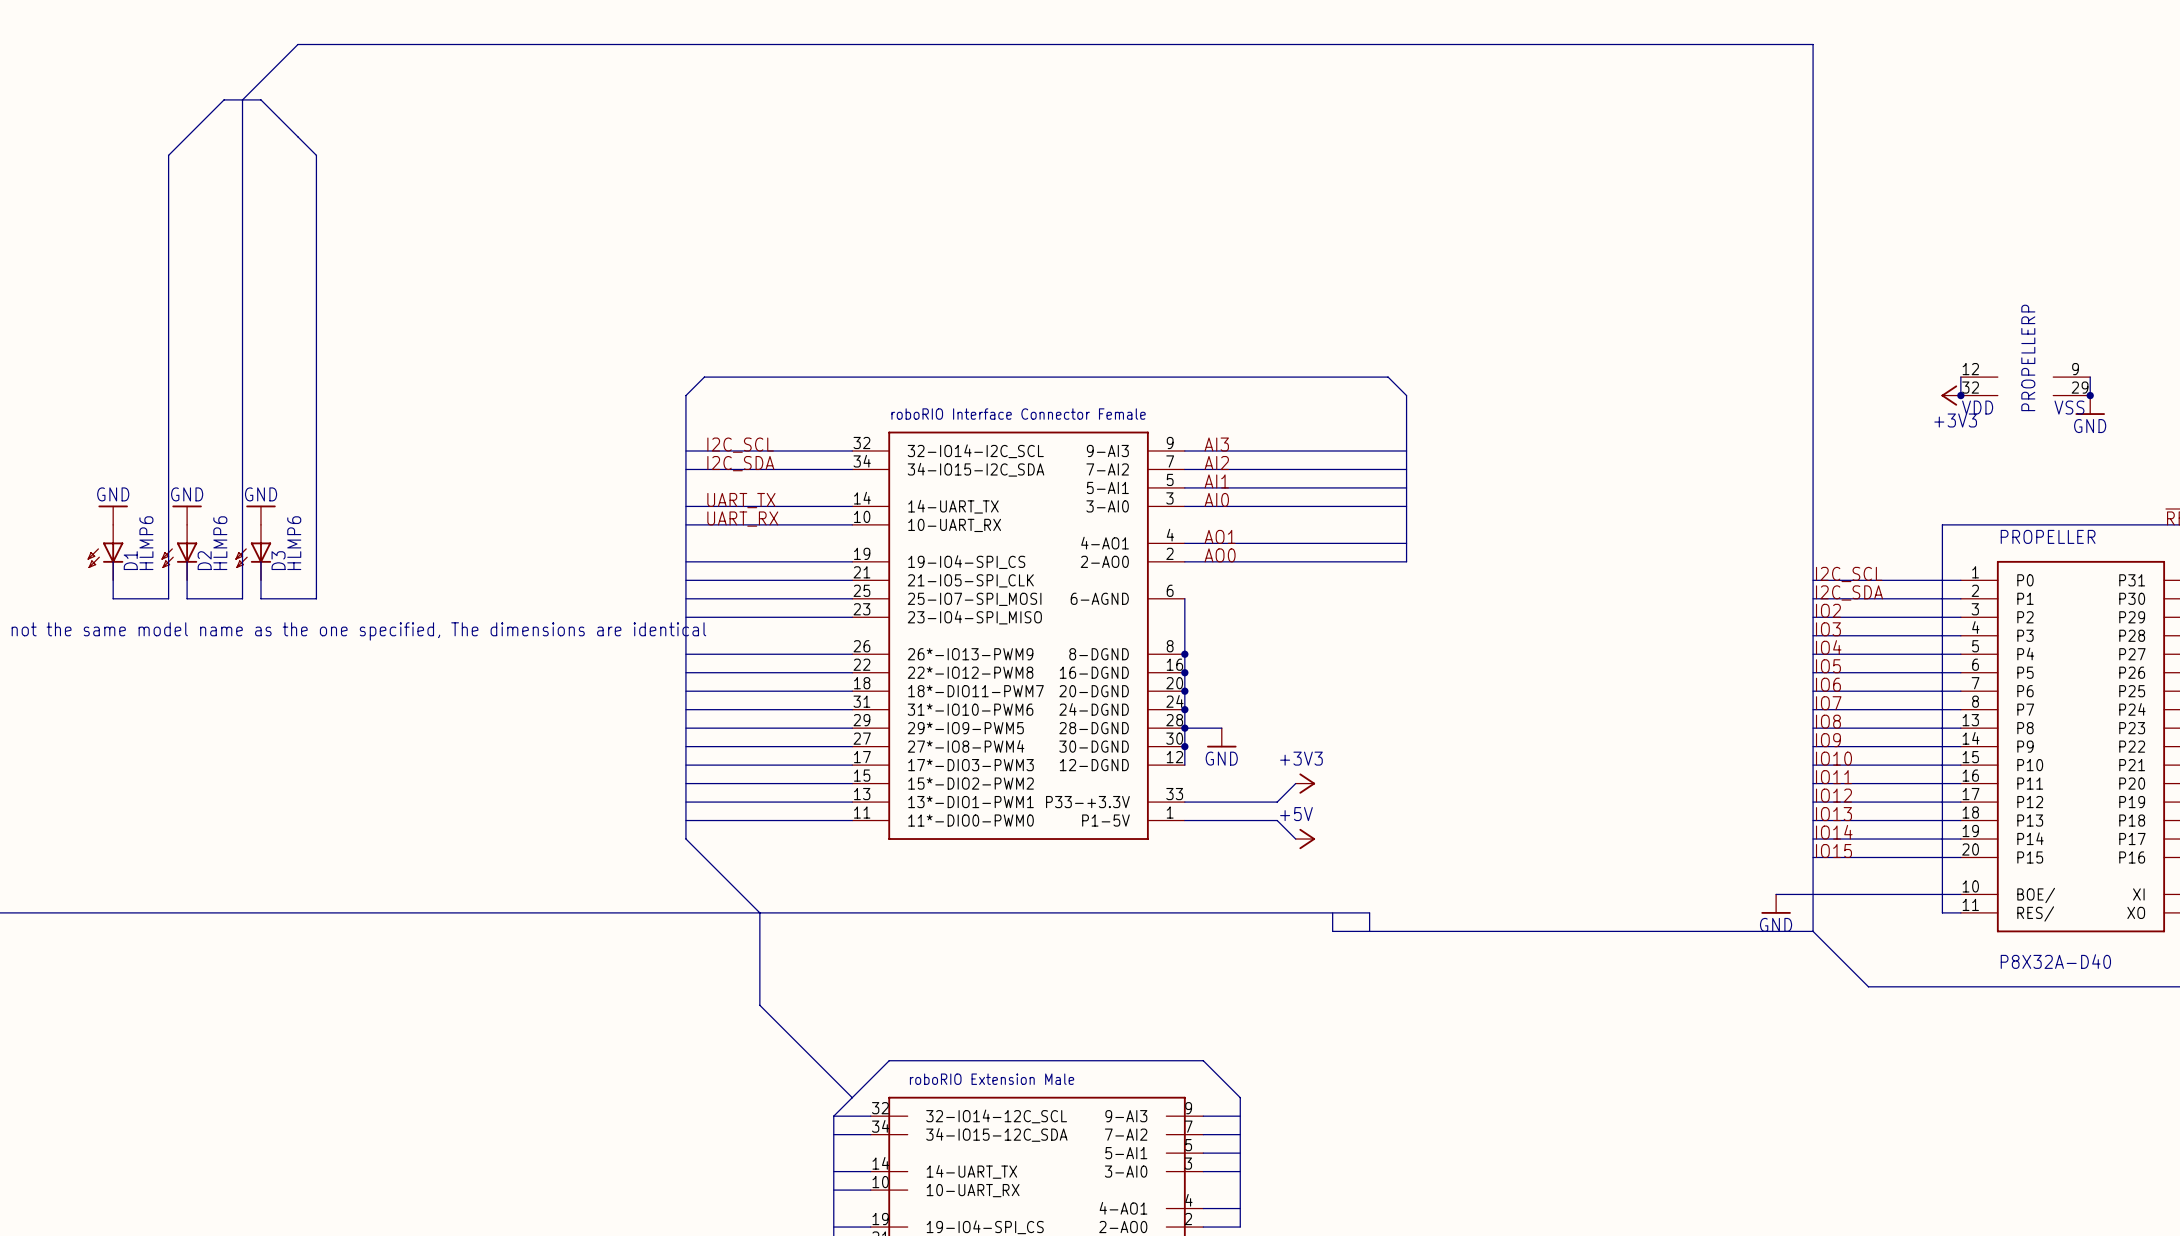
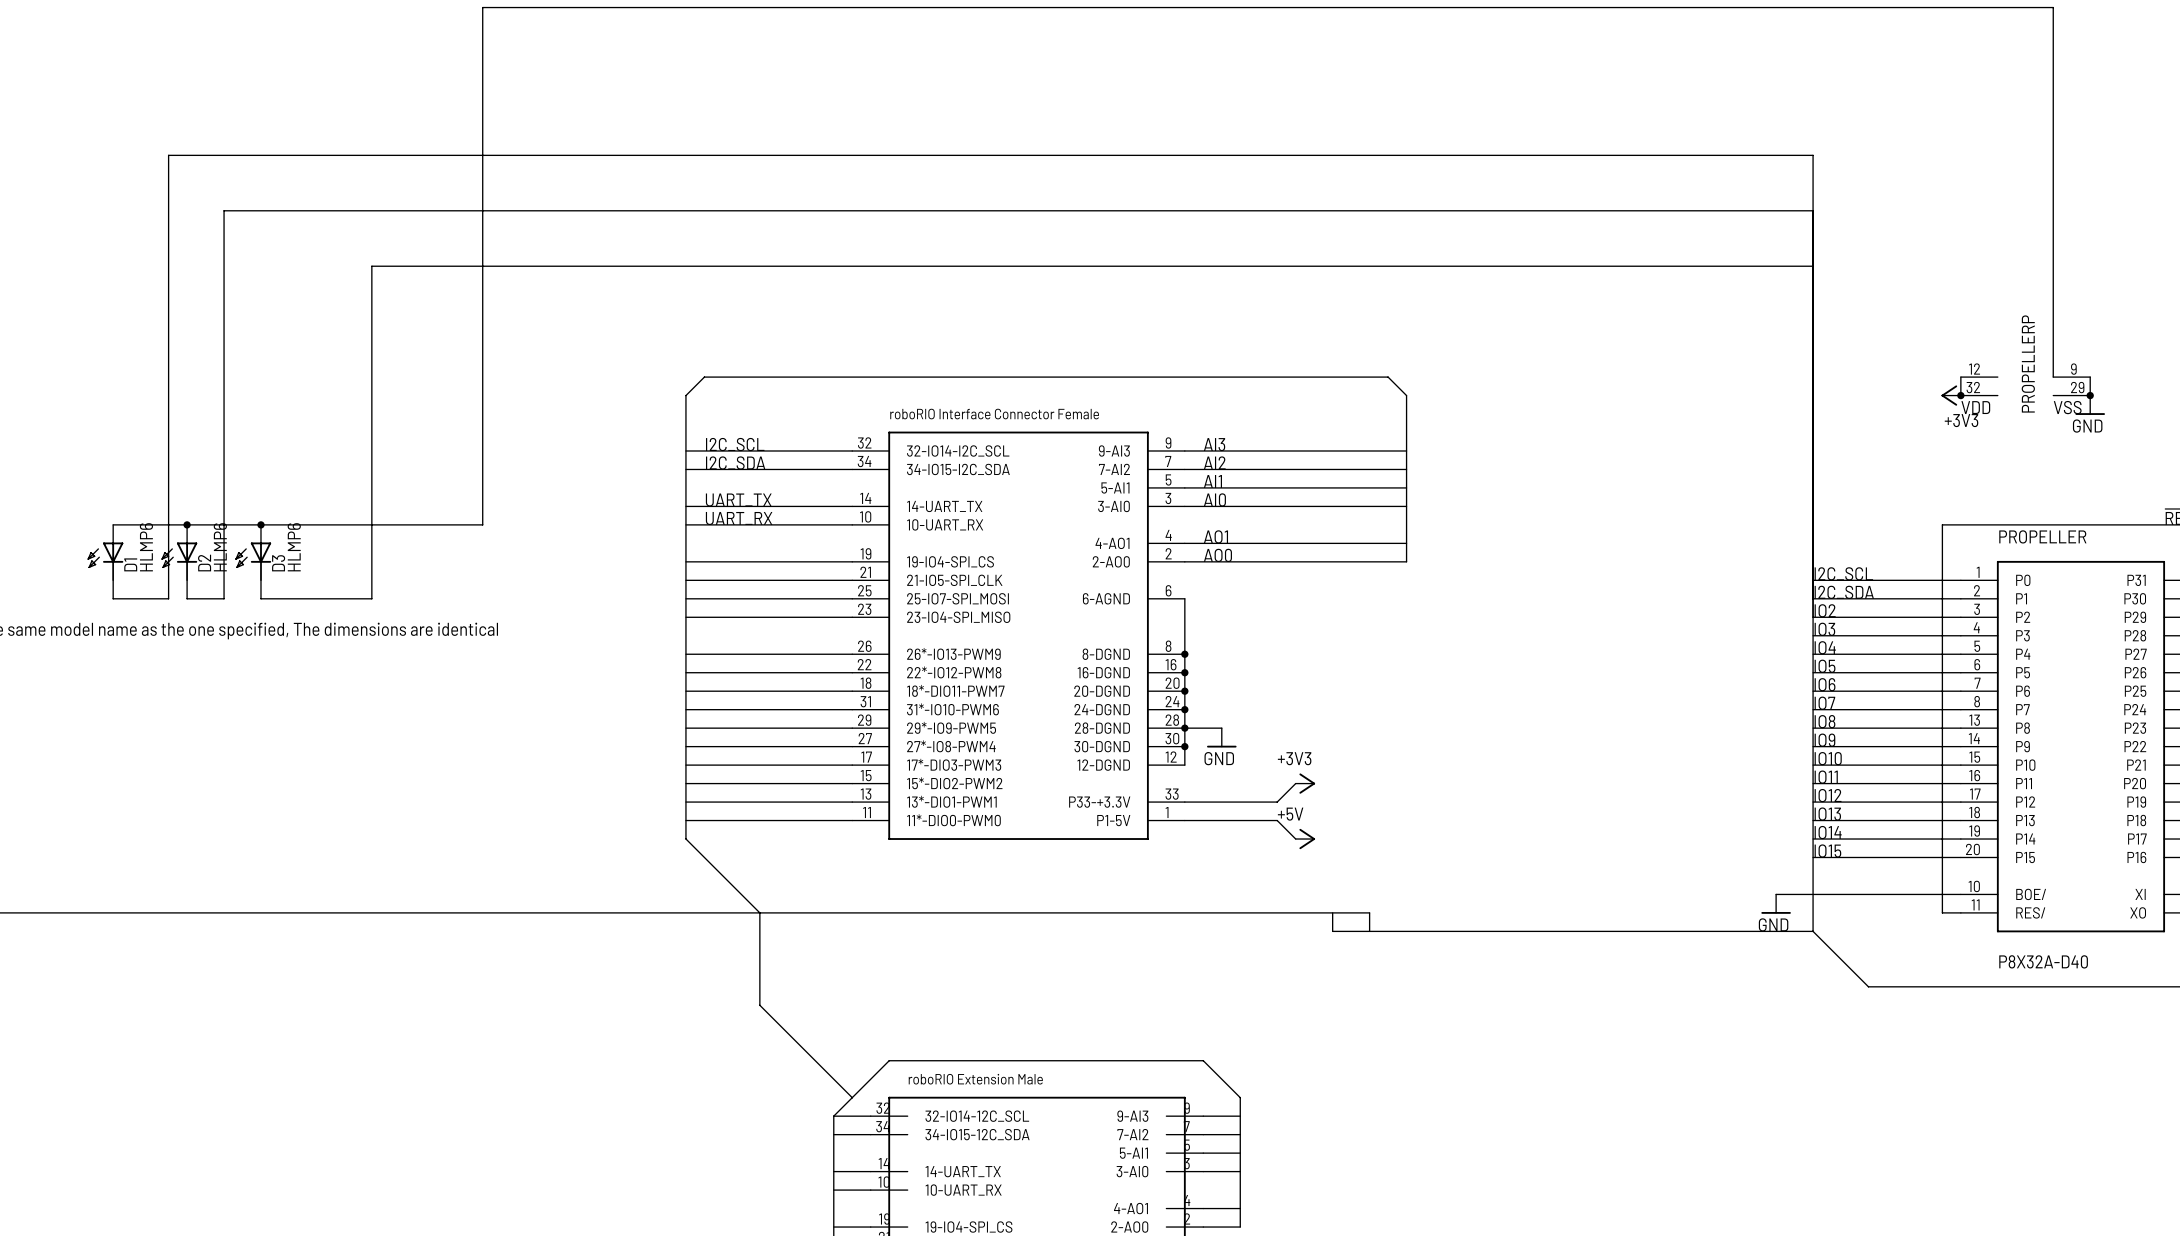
bus: (242, 99) (297, 44) (1813, 44) (1813, 580) -> none
wire: (242, 99) (242, 598) (224, 598) -> (1813, 210) (224, 210) (224, 598)
wire: (168, 155) (224, 99) (260, 99) (316, 155) (316, 598) -> (168, 155) (1813, 155) (1813, 617)
wire: none -> (1813, 266) (371, 266) (371, 598) (316, 598)
wire: none -> (2053, 377) (2053, 7) (482, 7) (482, 524) (113, 524)
power symbol: GND (113, 515) -> none
power symbol: GND (187, 515) -> none
power symbol: GND (260, 515) -> none
junction: none -> (187, 524)
junction: none -> (260, 524)

